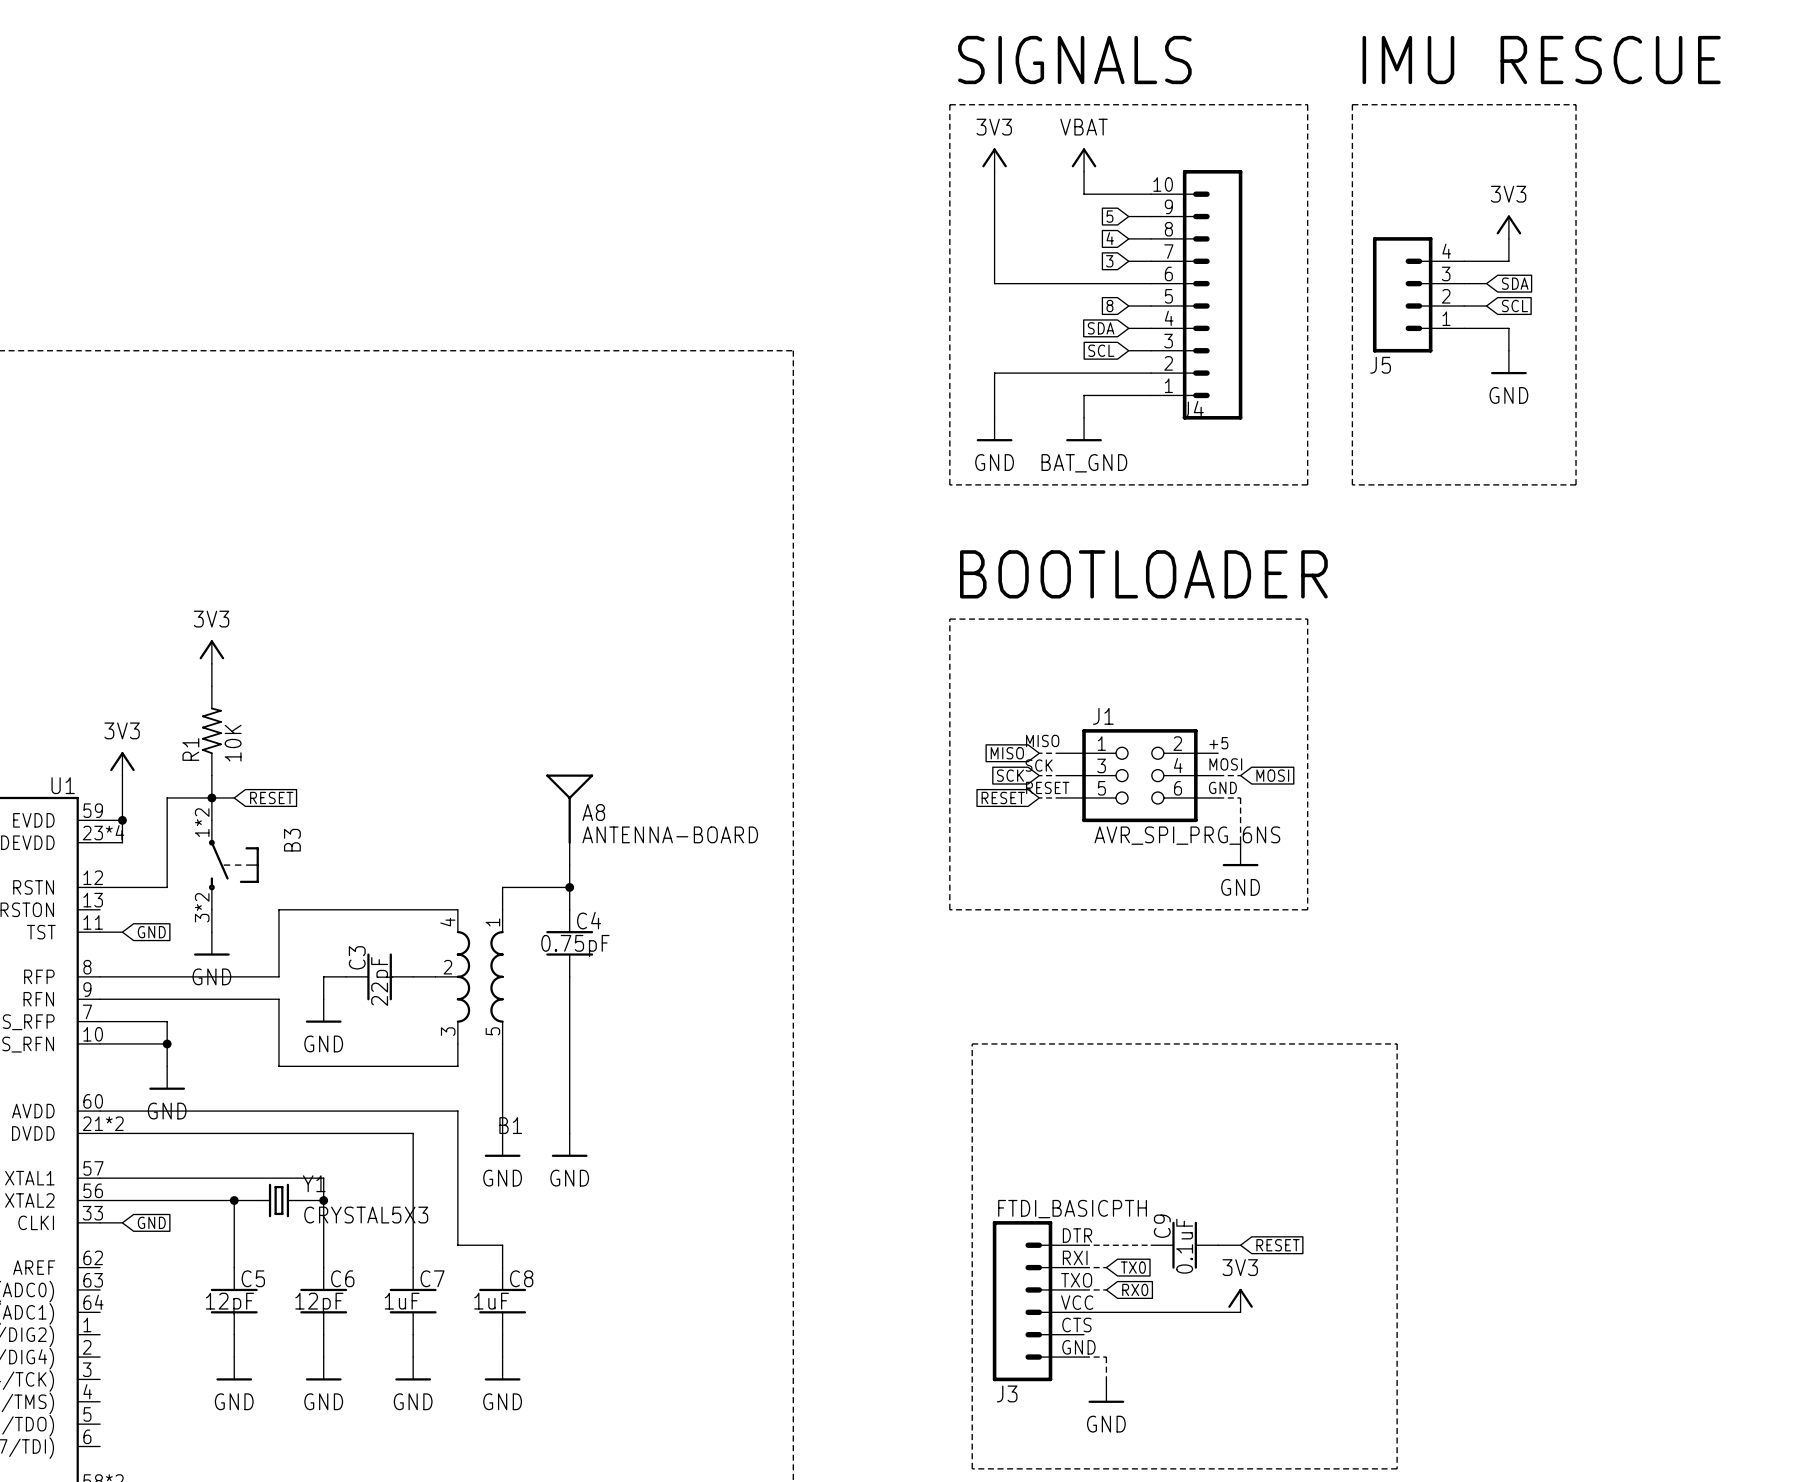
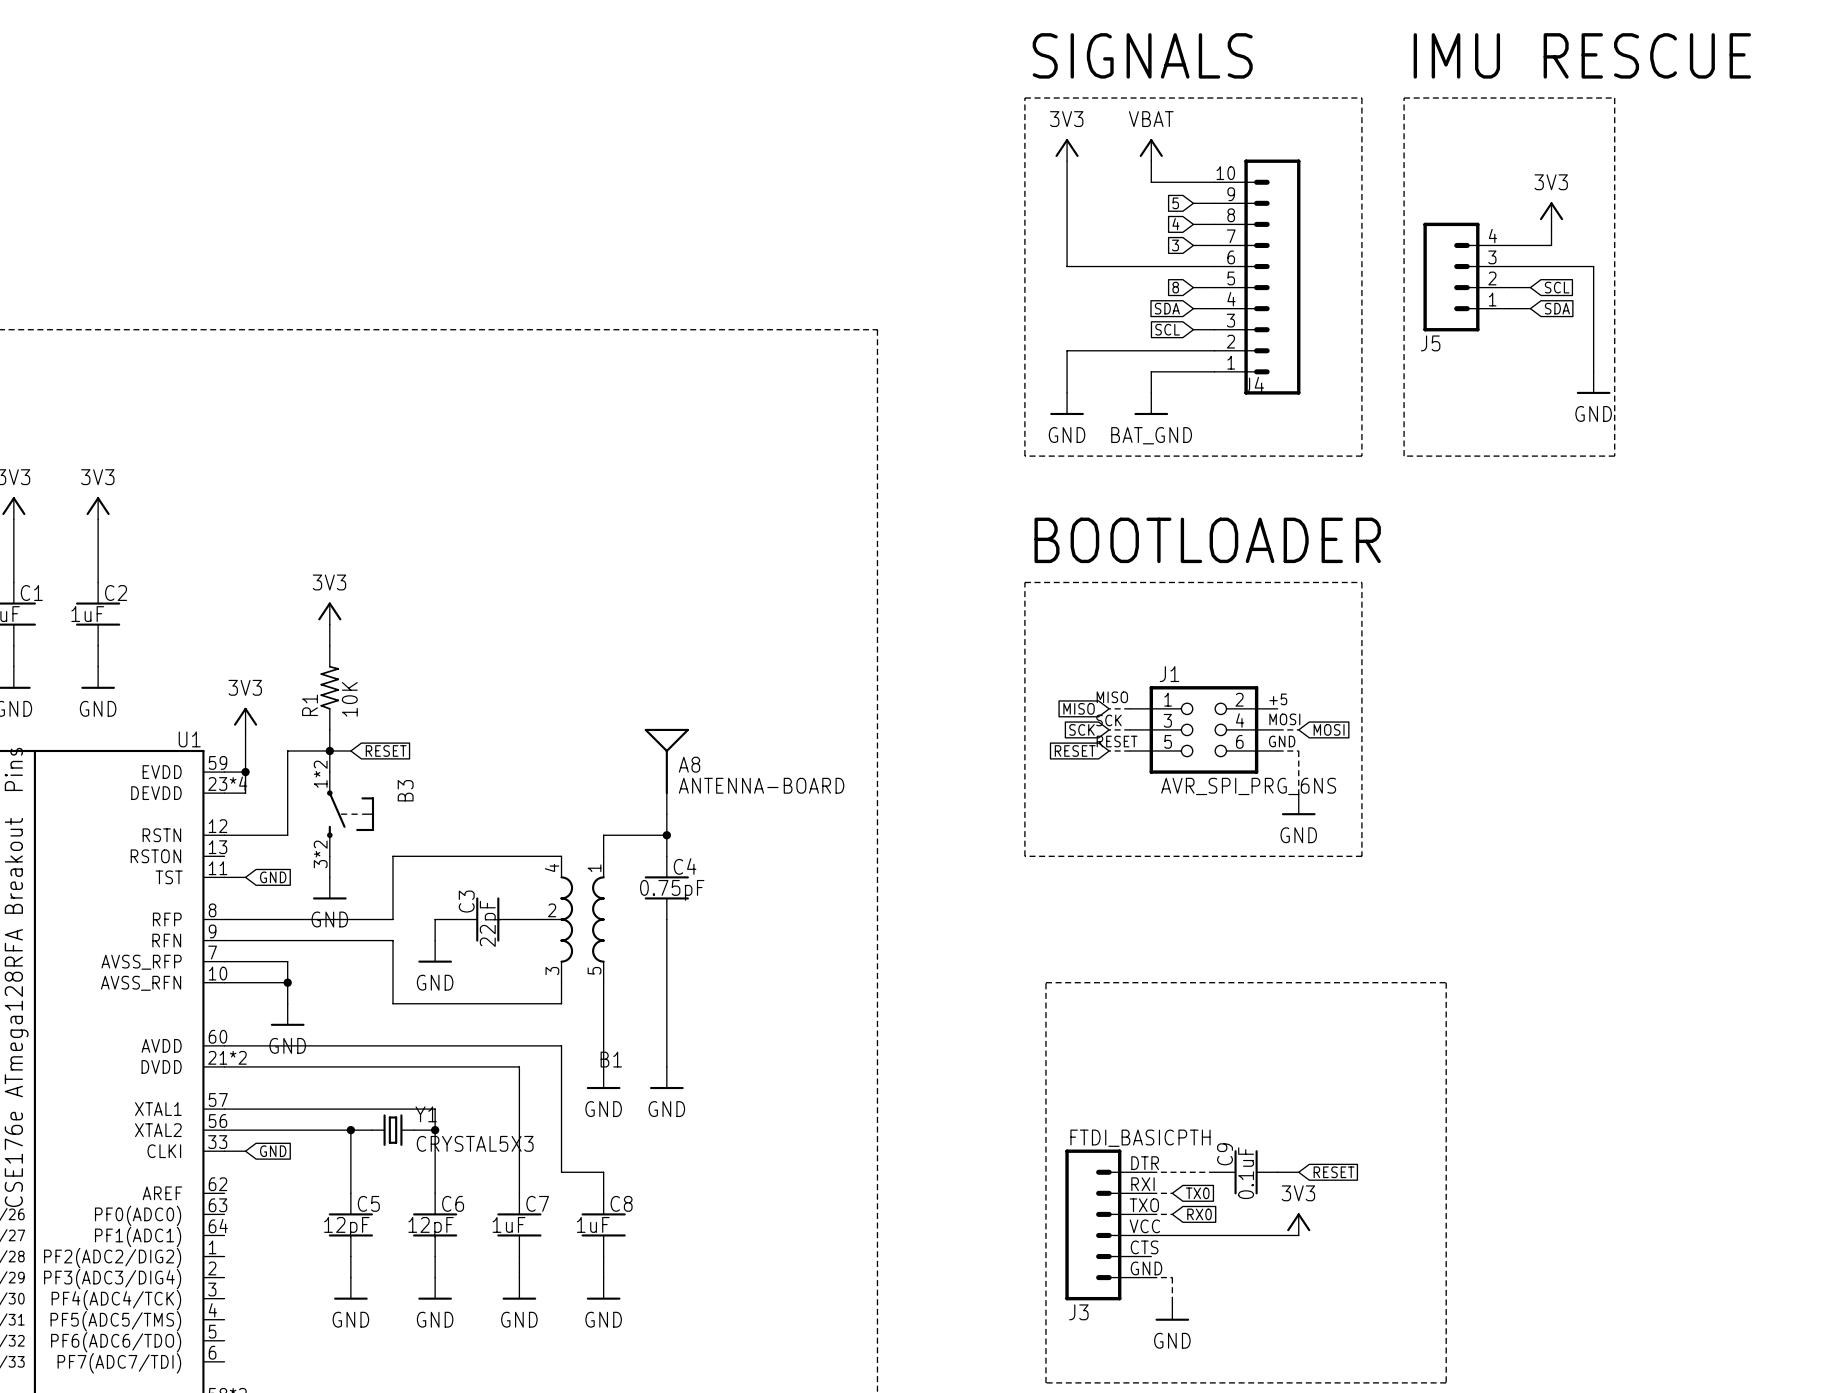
wire: none -> (1530, 266) (1593, 266) (1593, 371)
global label position: SDA (1515, 283) -> SDA (1557, 308)
wire: (1486, 328) (1508, 328) (1508, 350) -> none
power symbol position: GND (1508, 362) -> GND (1593, 382)

